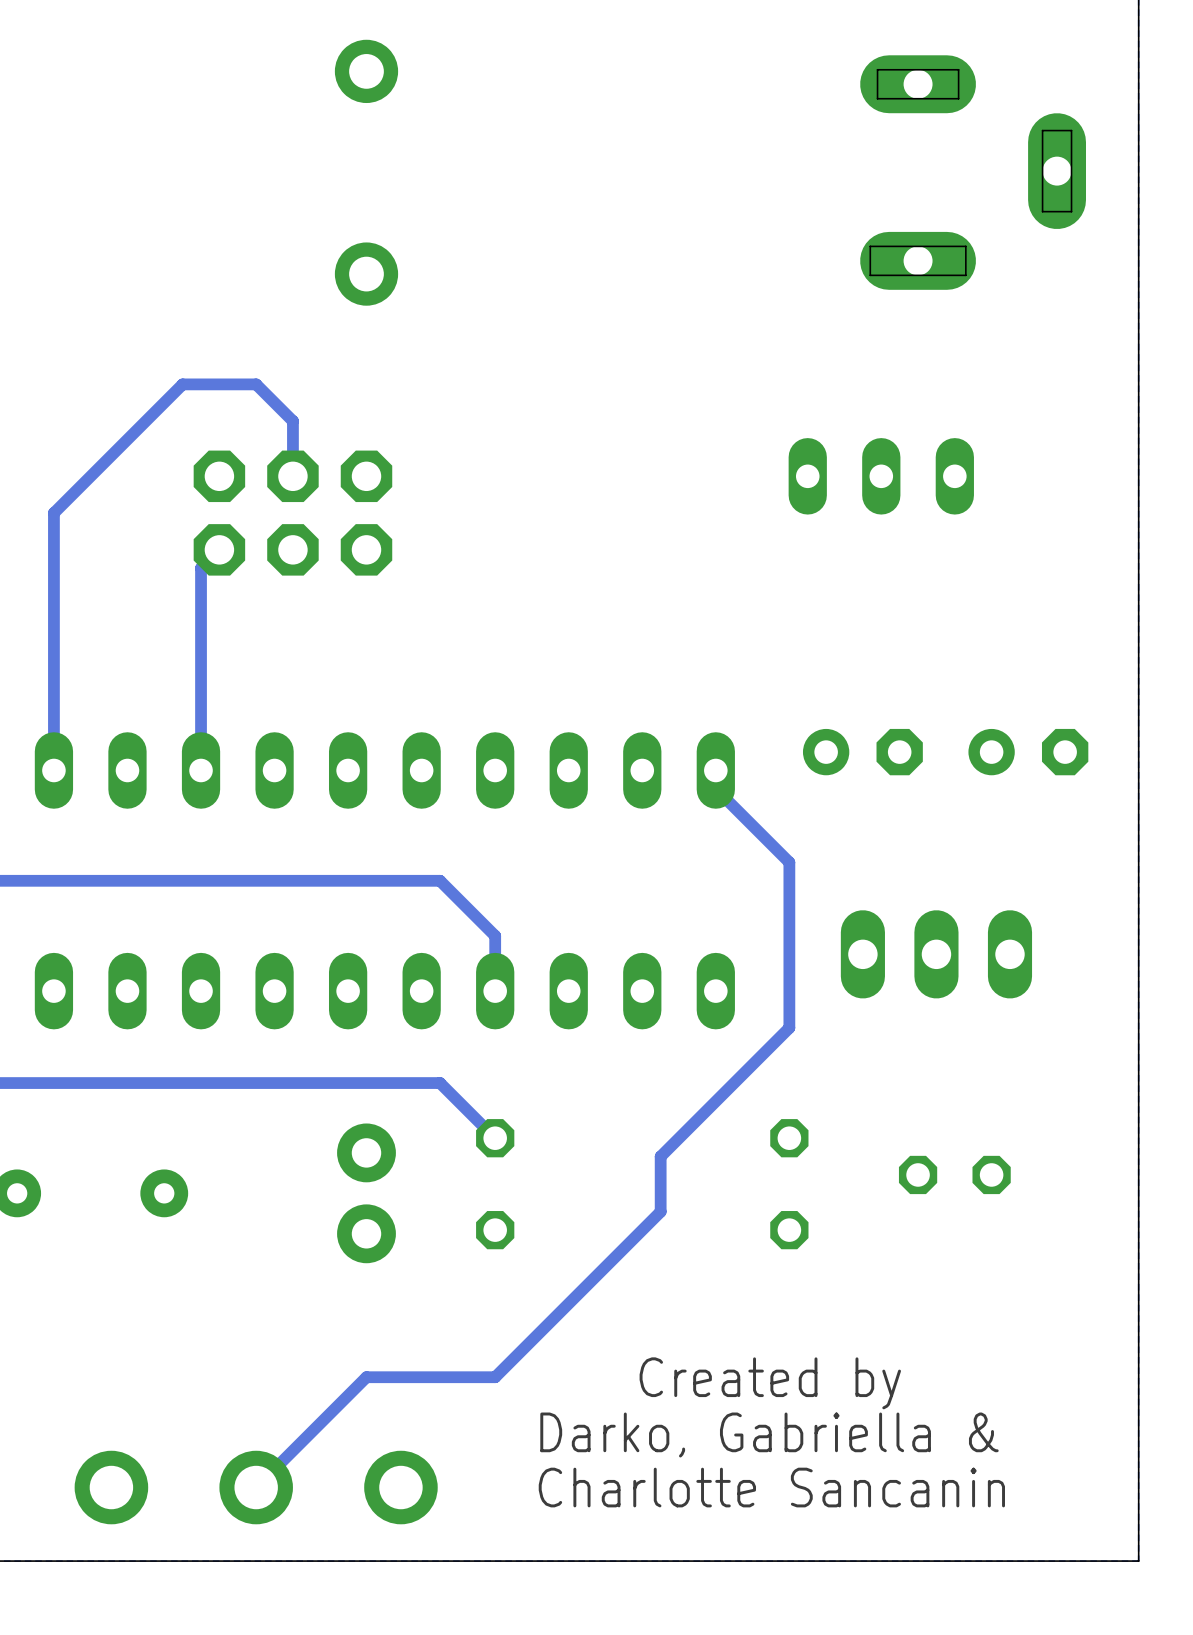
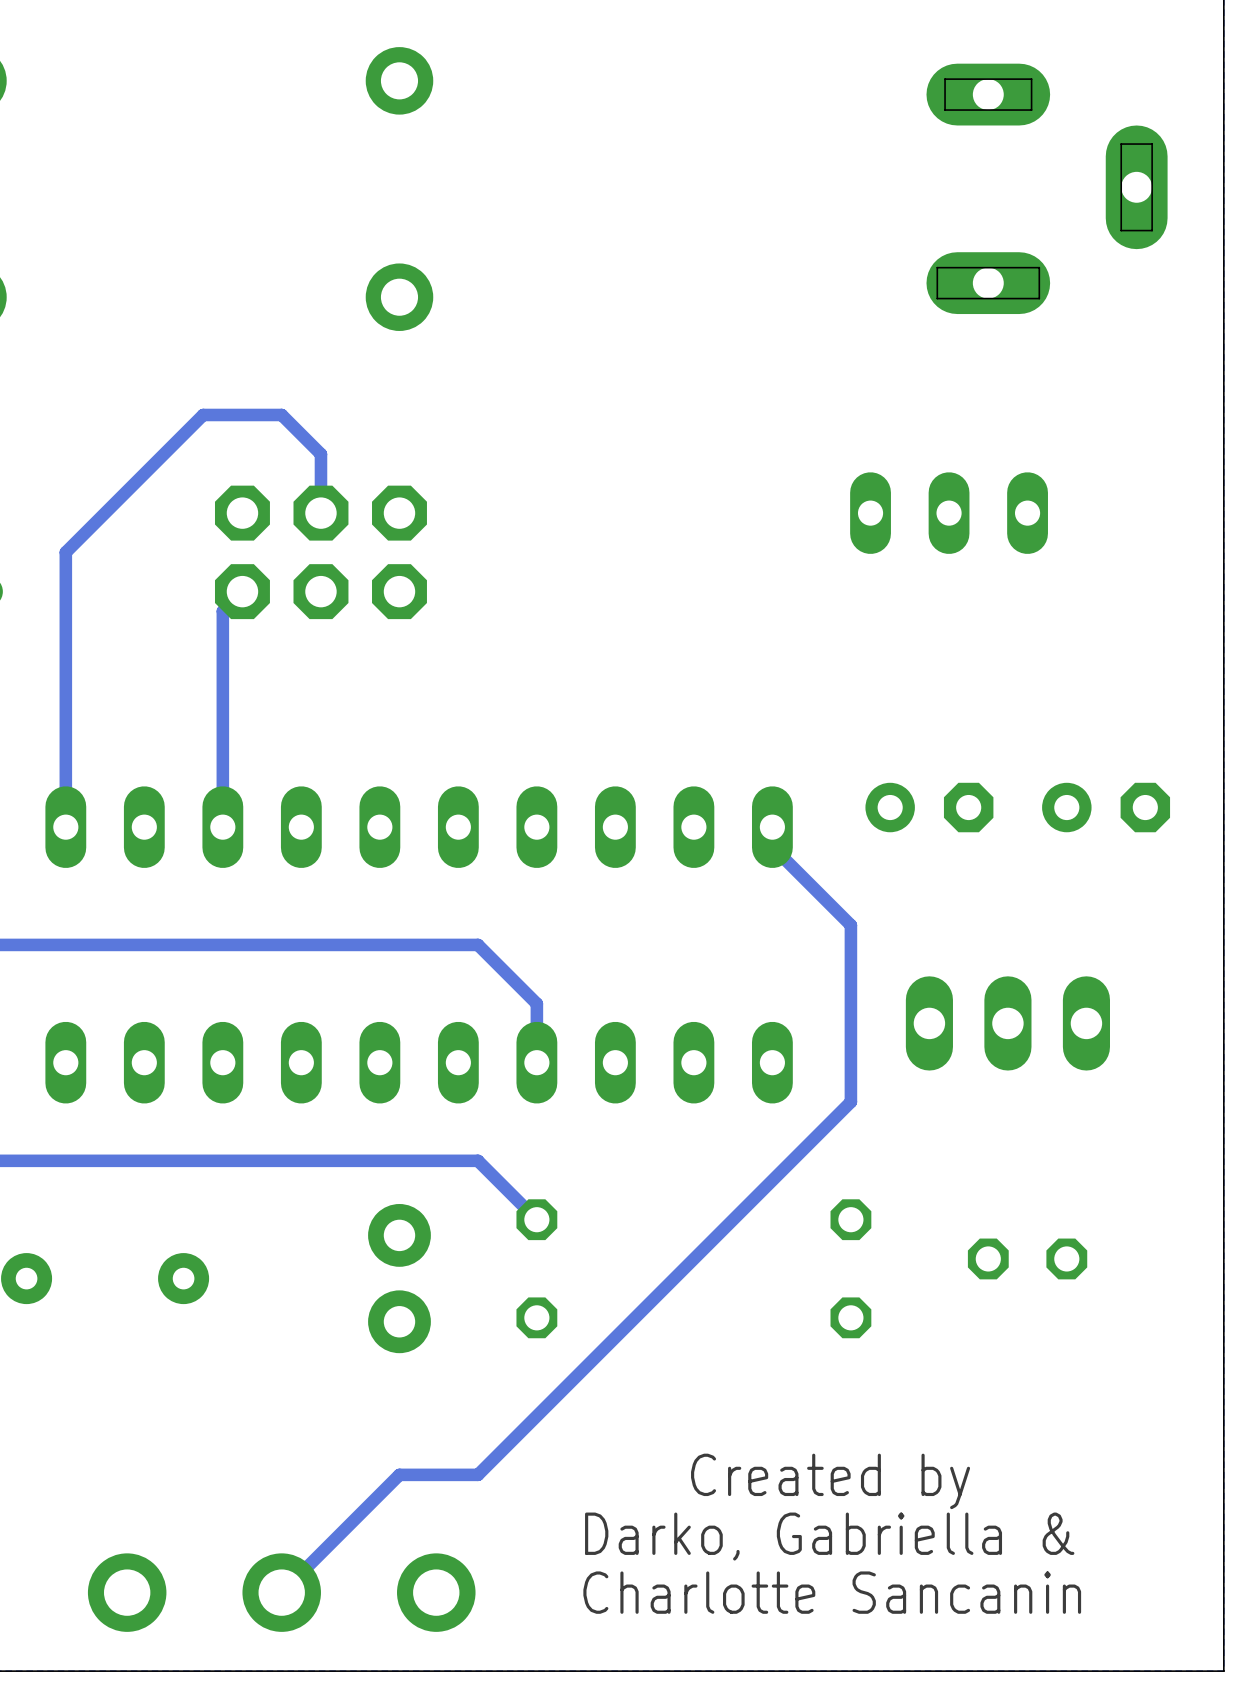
track: (660, 1156) (660, 1211) (495, 1377) (440, 1377) -> (713, 1239) (477, 1474)

